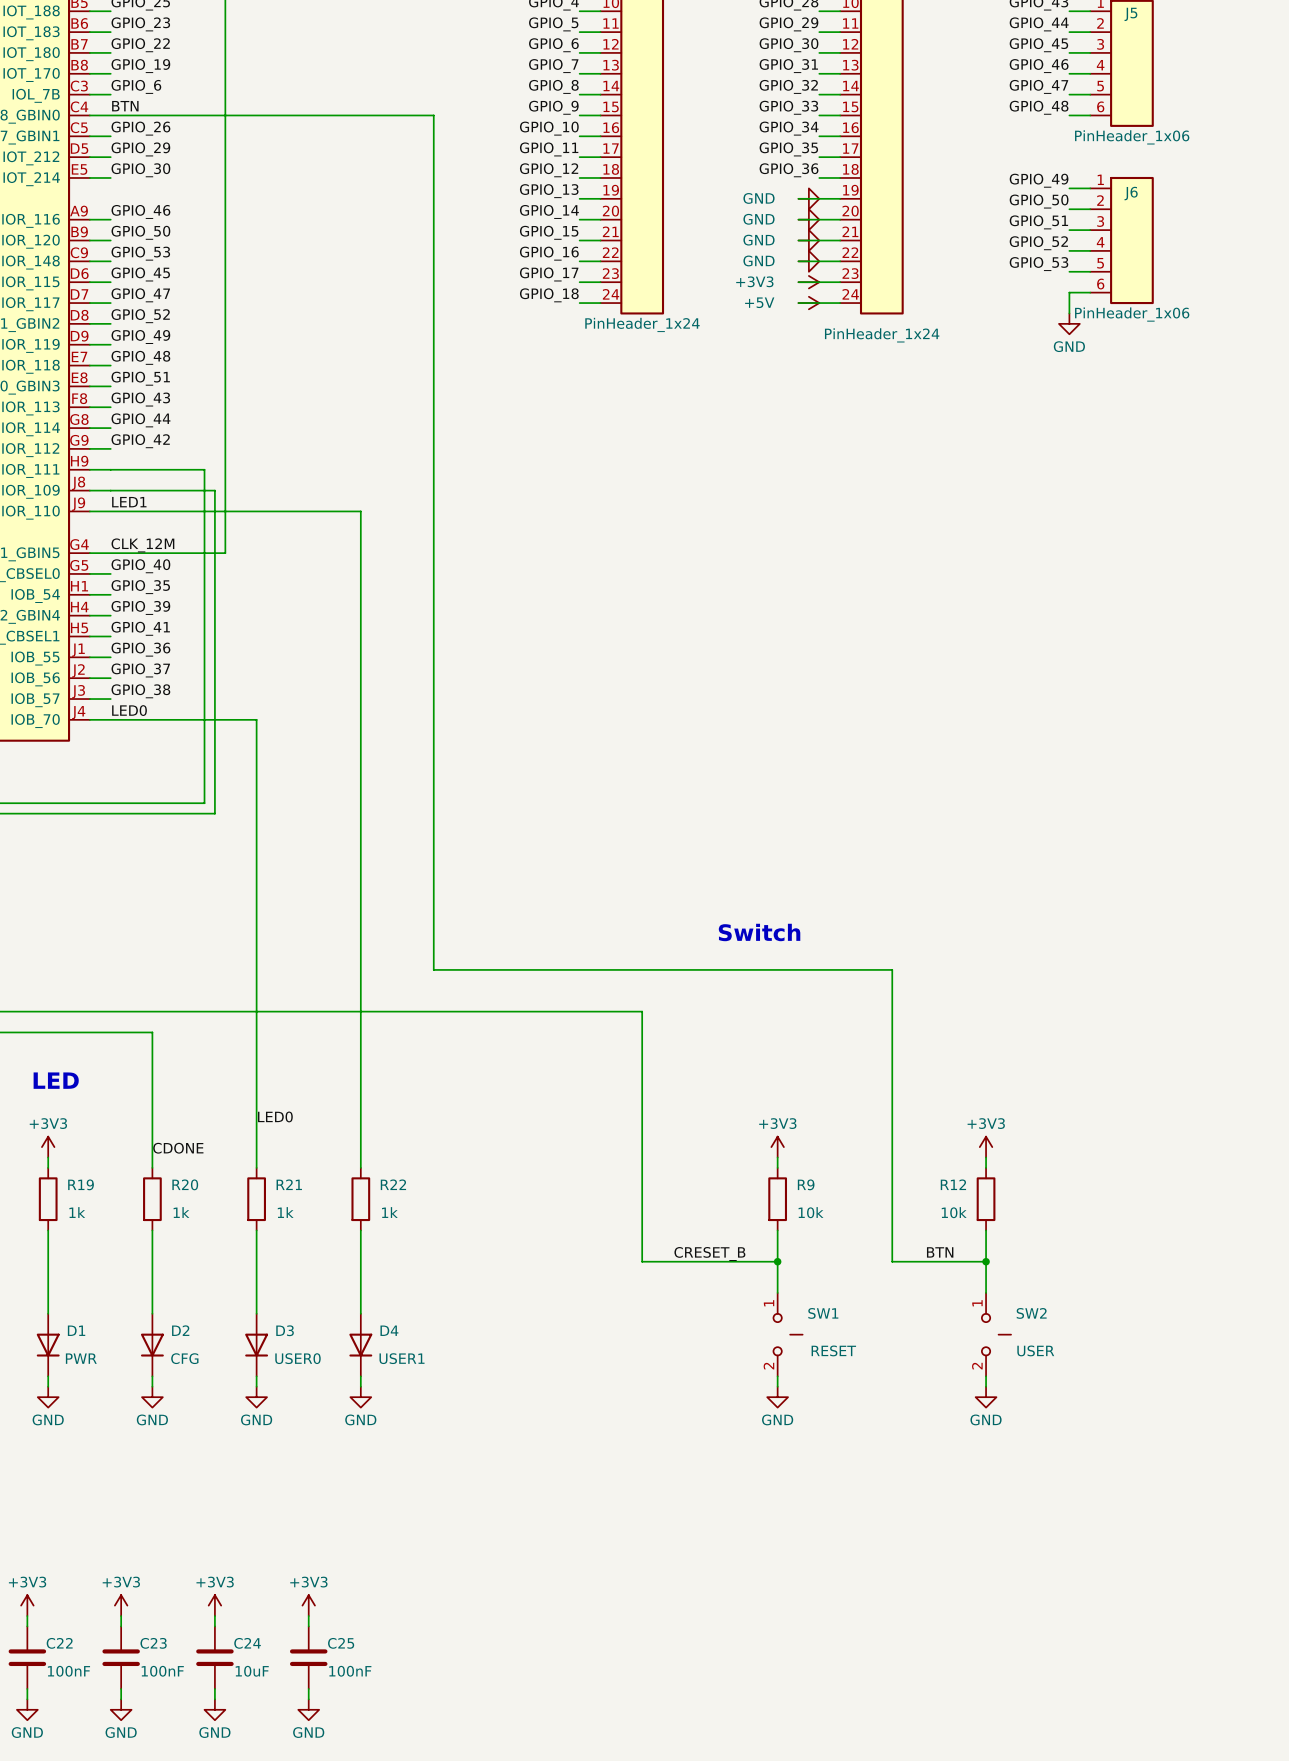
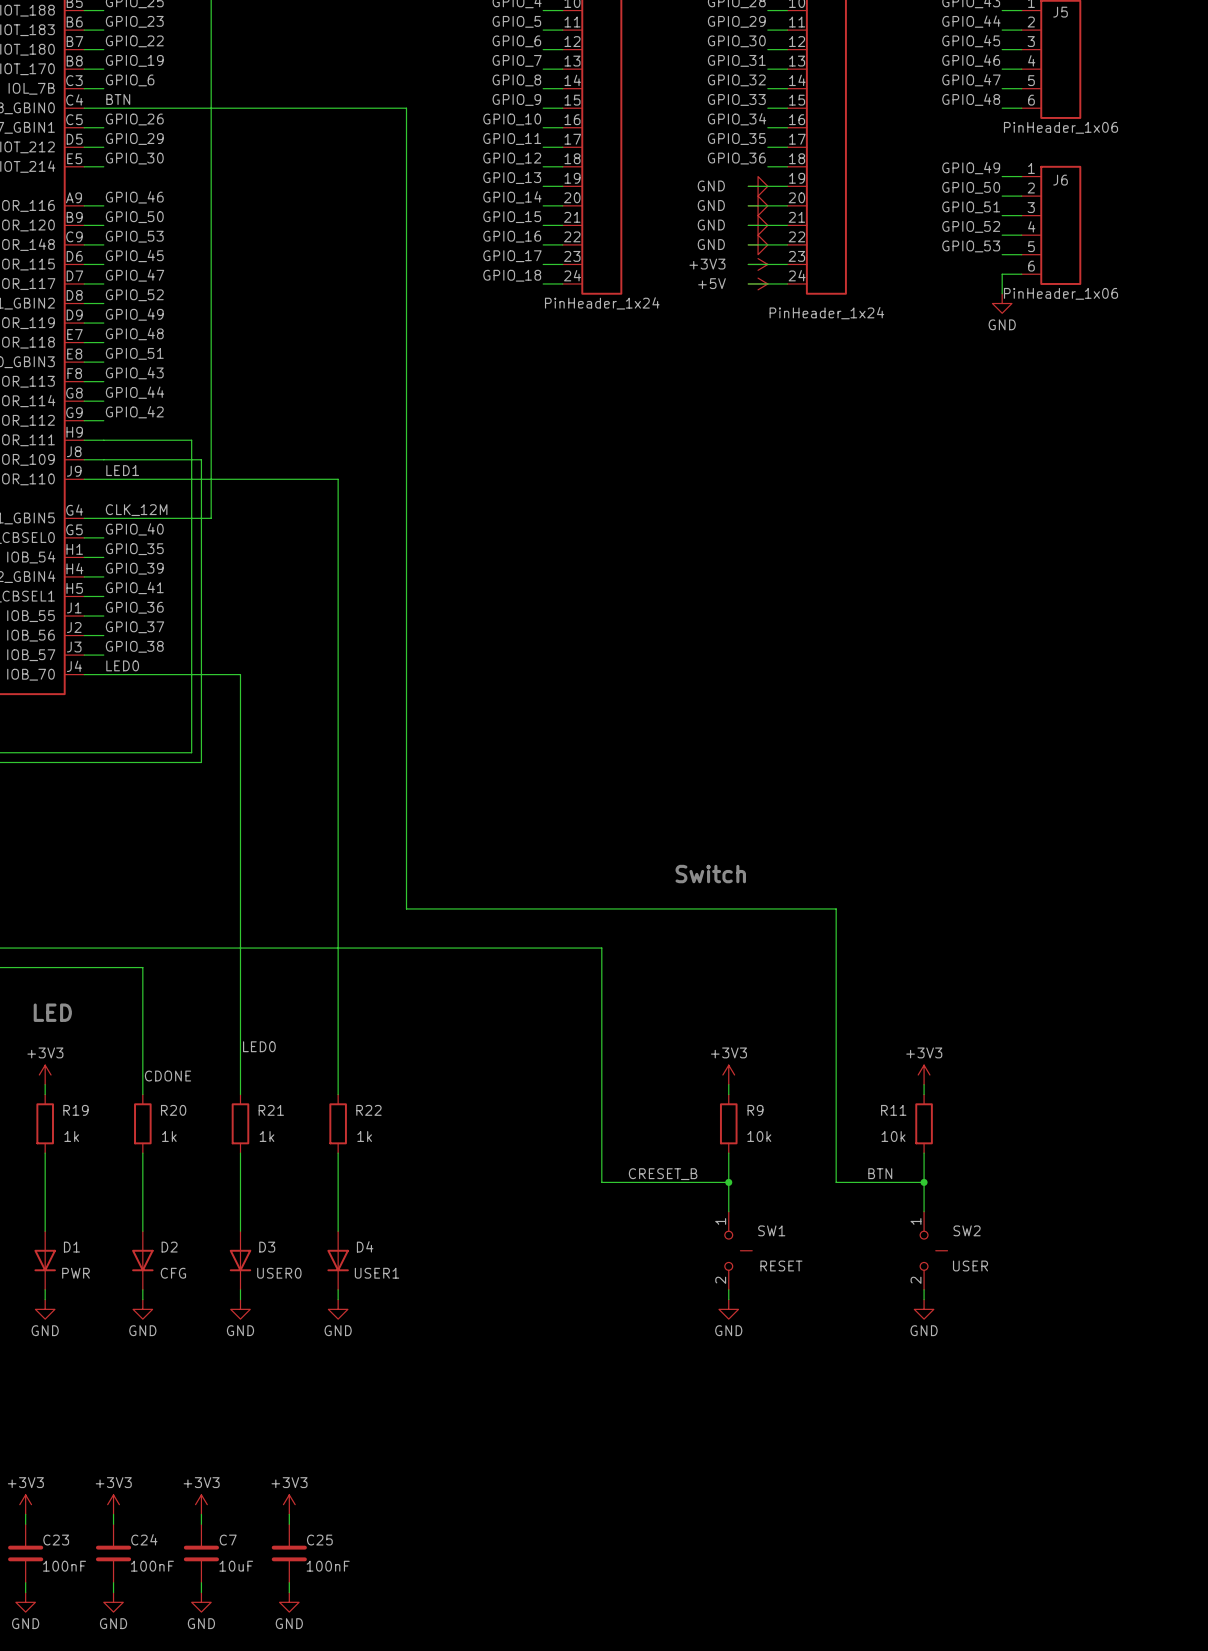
R12 name: R12 (953, 1184) -> R11 (893, 1110)
C22 name: C22 (59, 1643) -> C23 (56, 1540)
C23 name: C23 (153, 1643) -> C24 (144, 1539)
C24 name: C24 (247, 1643) -> C7 (228, 1540)

